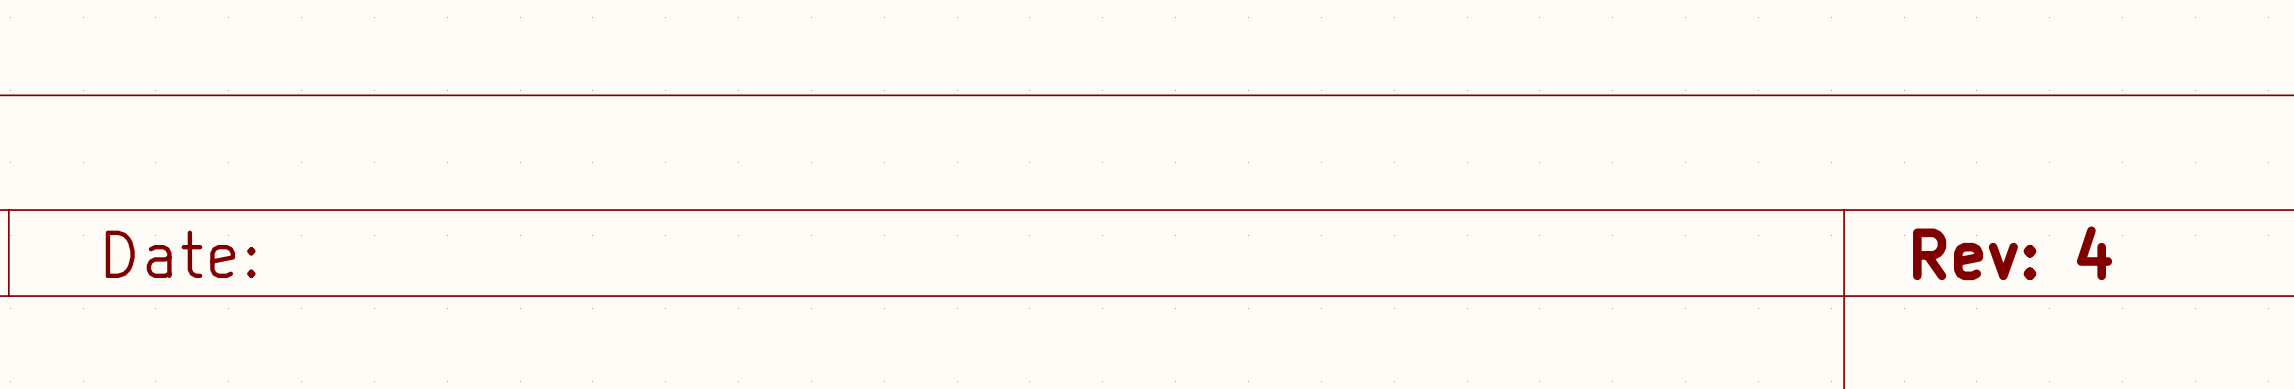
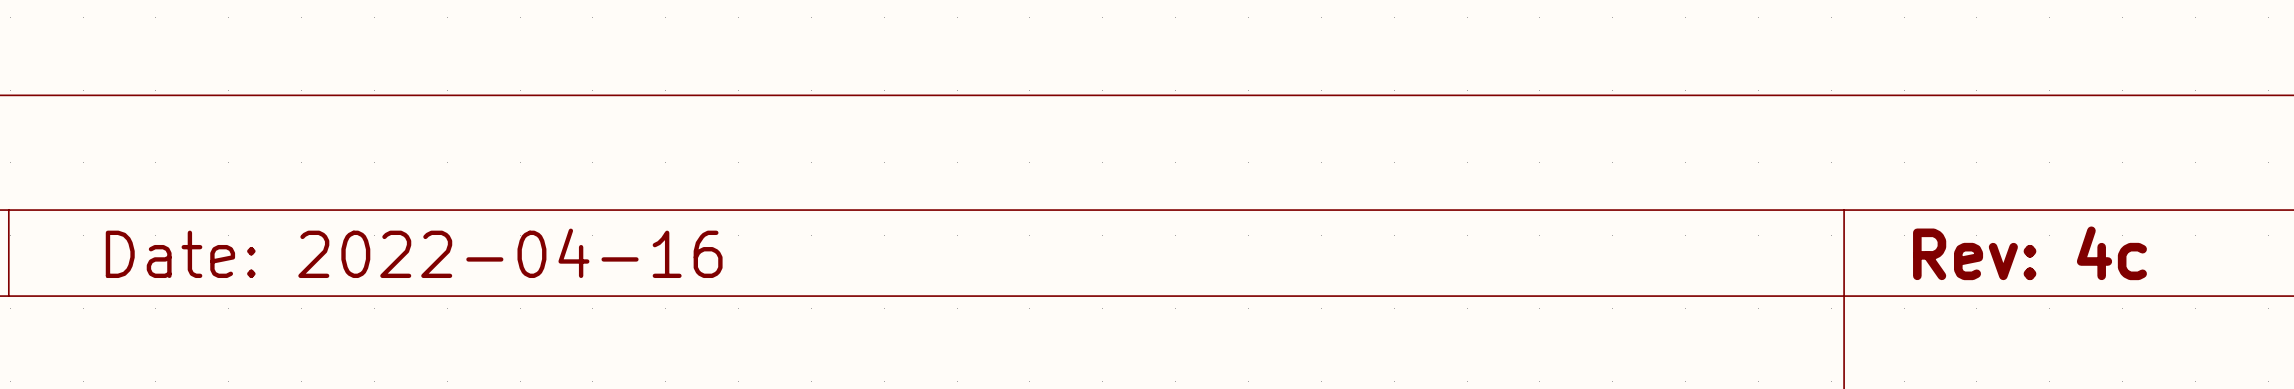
title block: Rev: 4 (2012, 253) -> Rev: 4c (2029, 253)
title block: Date: (180, 254) -> Date: 2022-04-16 (414, 253)

